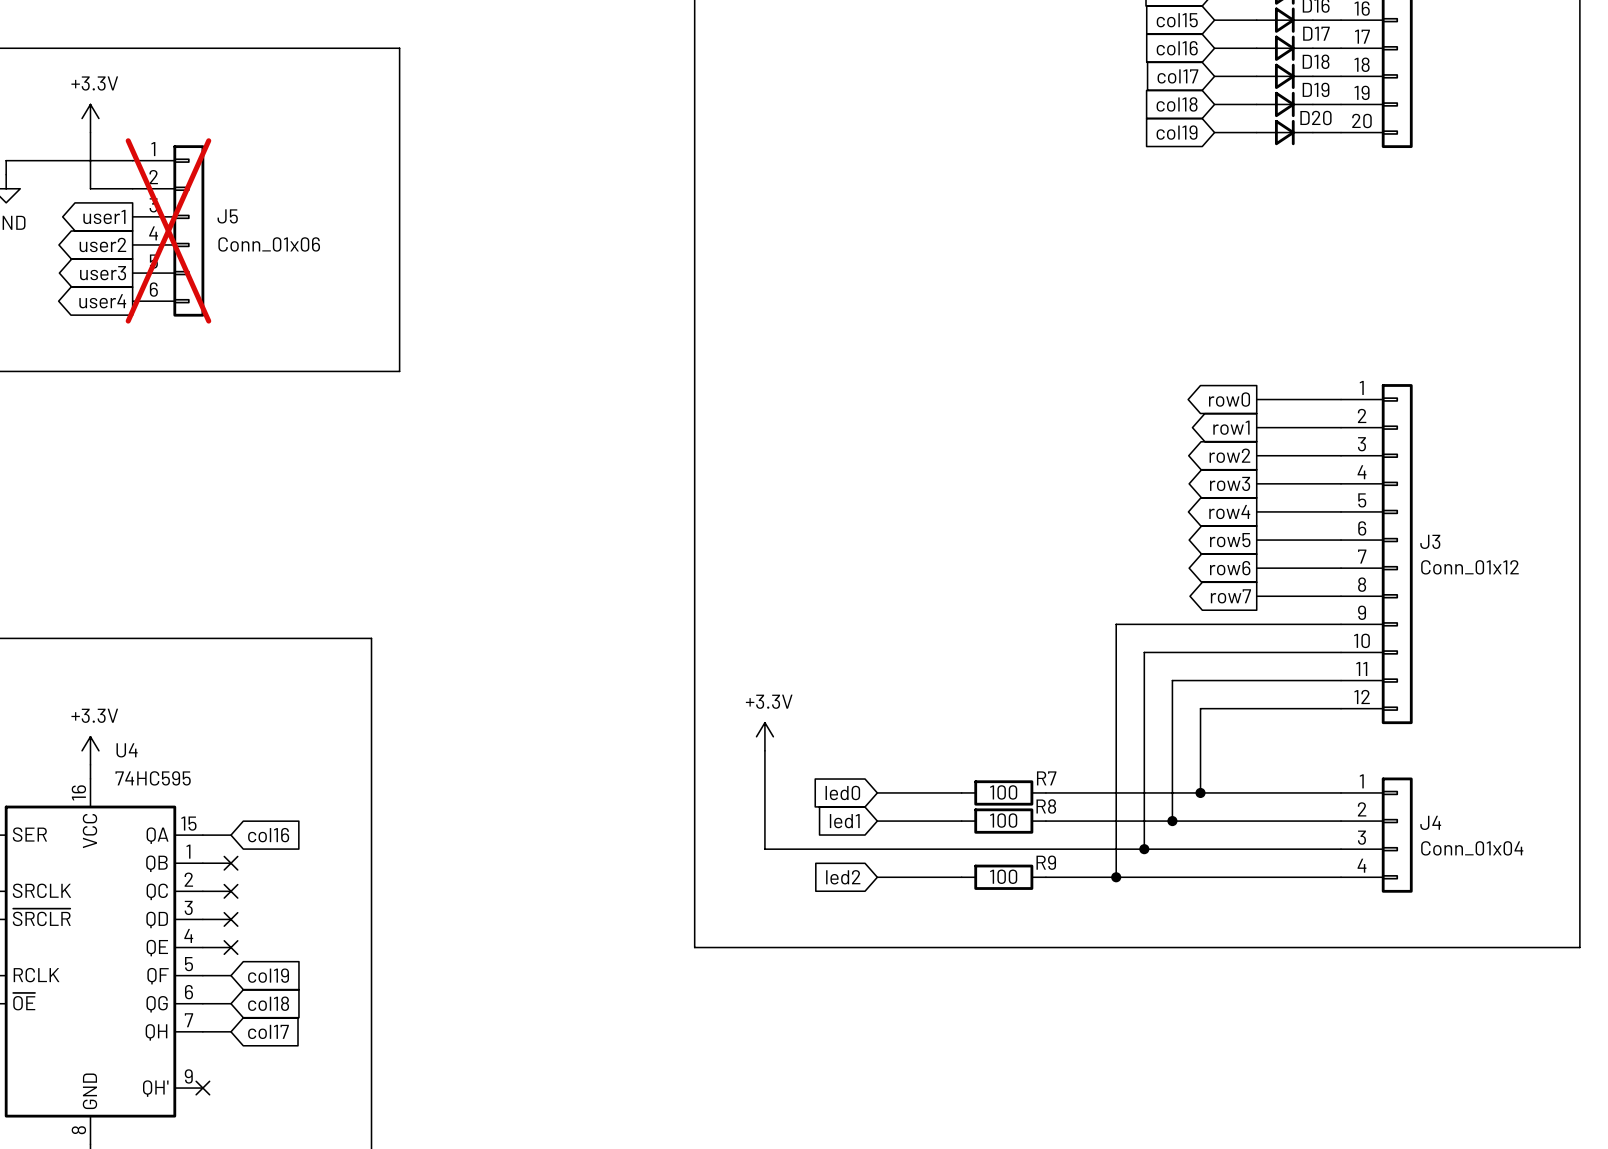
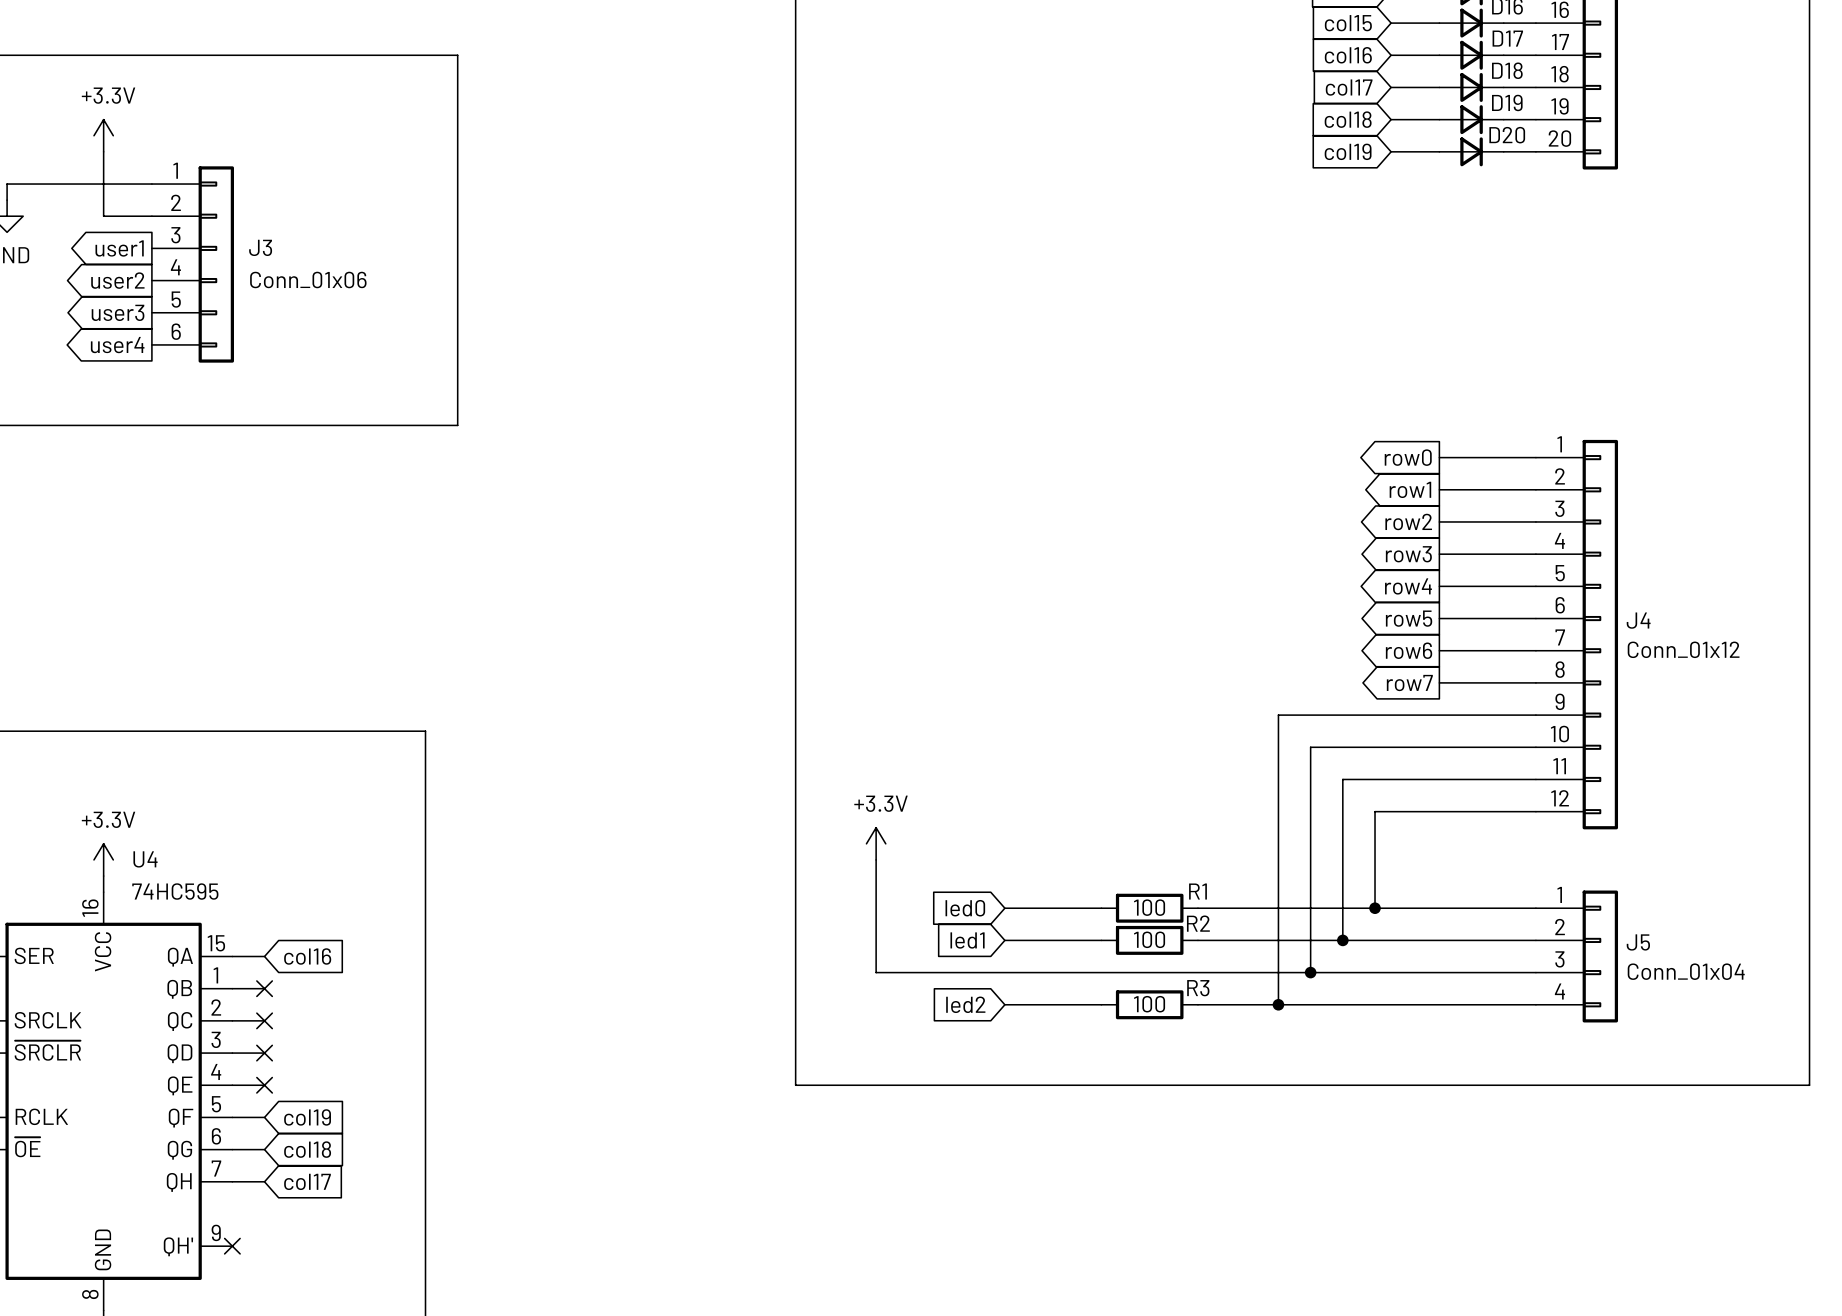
J5 name: J5 (227, 216) -> J3 (260, 247)
J5 do-not-place cross: (168, 230) -> none
J3 name: J3 (1430, 541) -> J4 (1638, 620)
R7 name: R7 (1046, 778) -> R1 (1197, 891)
R8 name: R8 (1046, 806) -> R2 (1198, 923)
J4 name: J4 (1430, 822) -> J5 (1638, 942)
R9 name: R9 (1046, 862) -> R3 (1198, 988)

